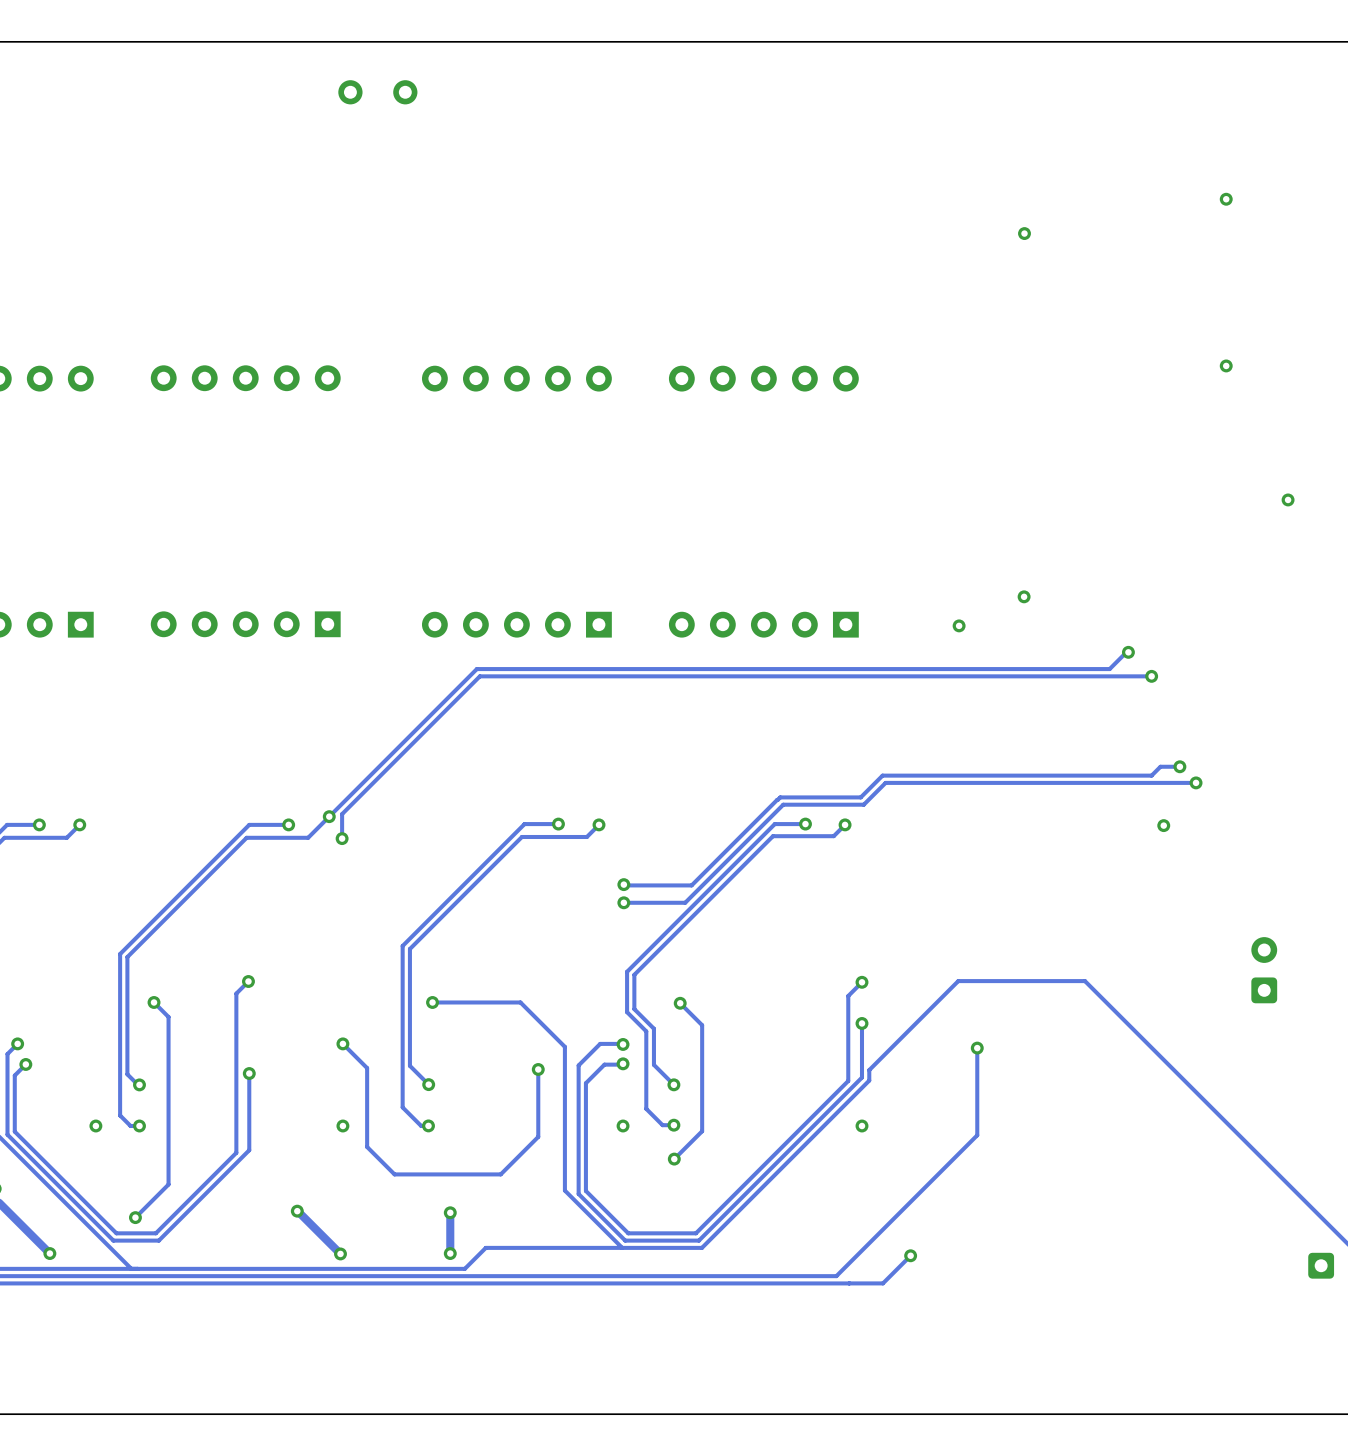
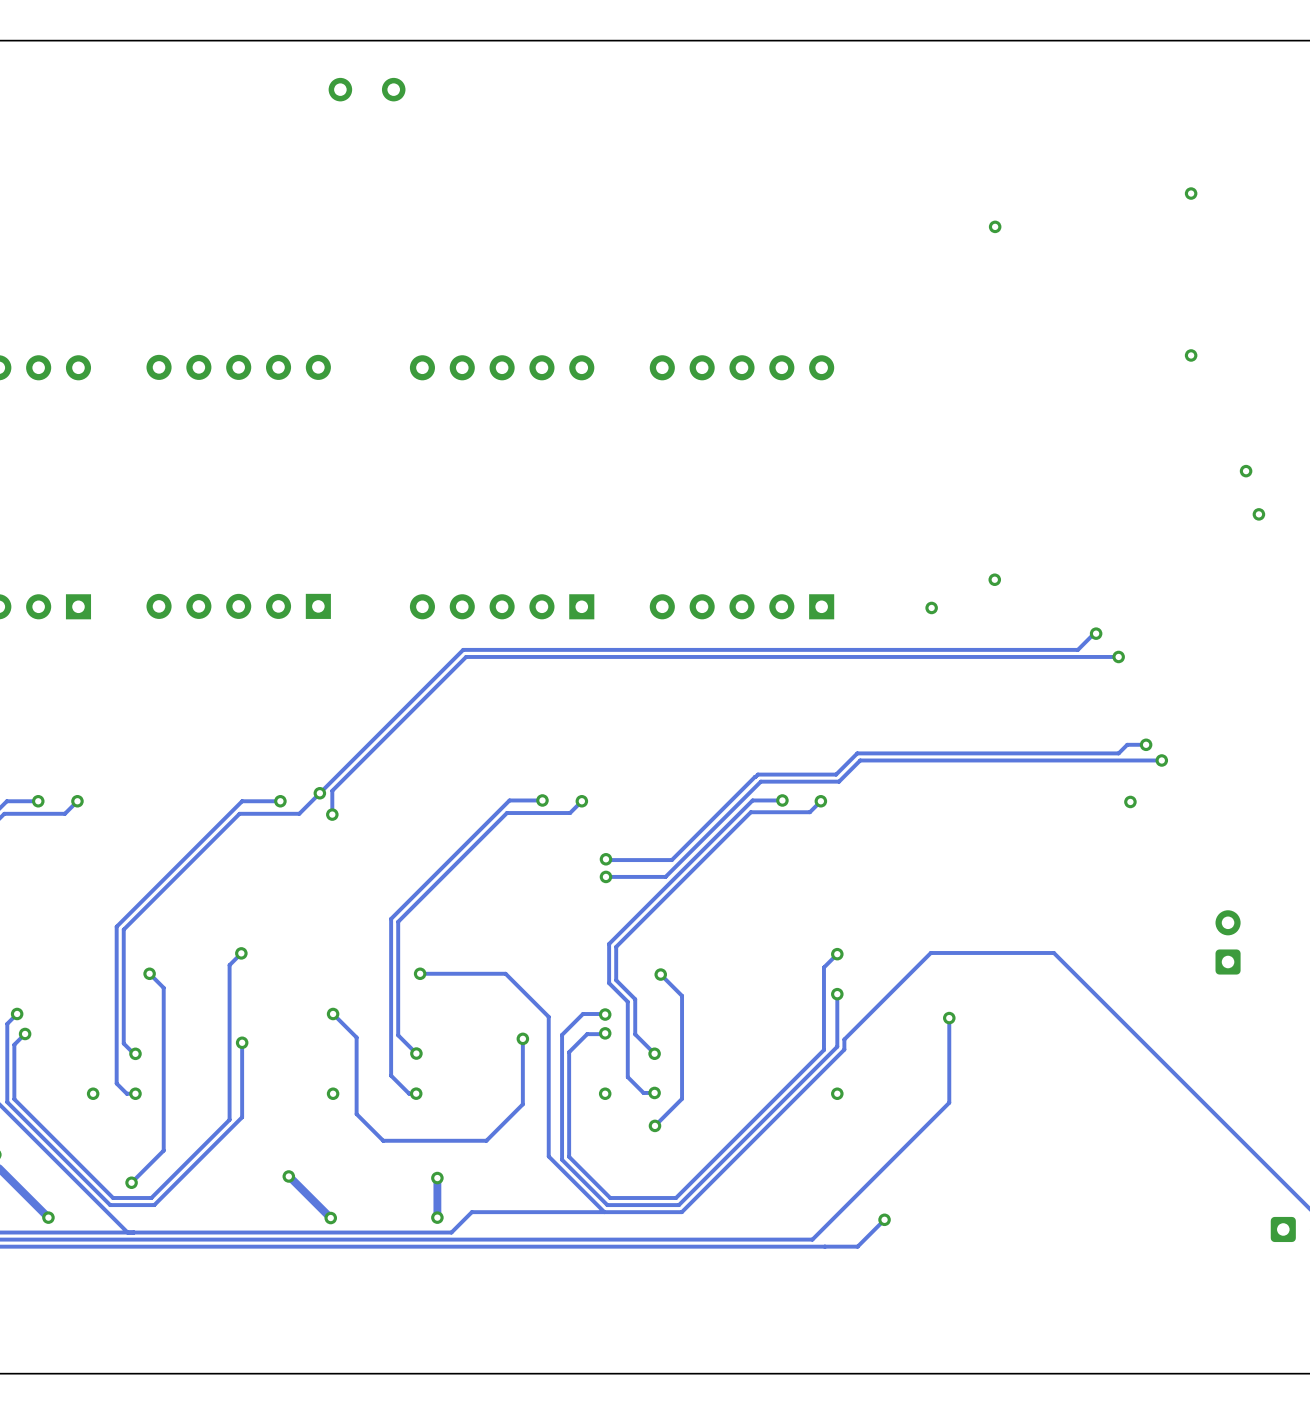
via: none -> (1246, 471)
via: (1288, 499) -> none
via: none -> (1258, 514)

